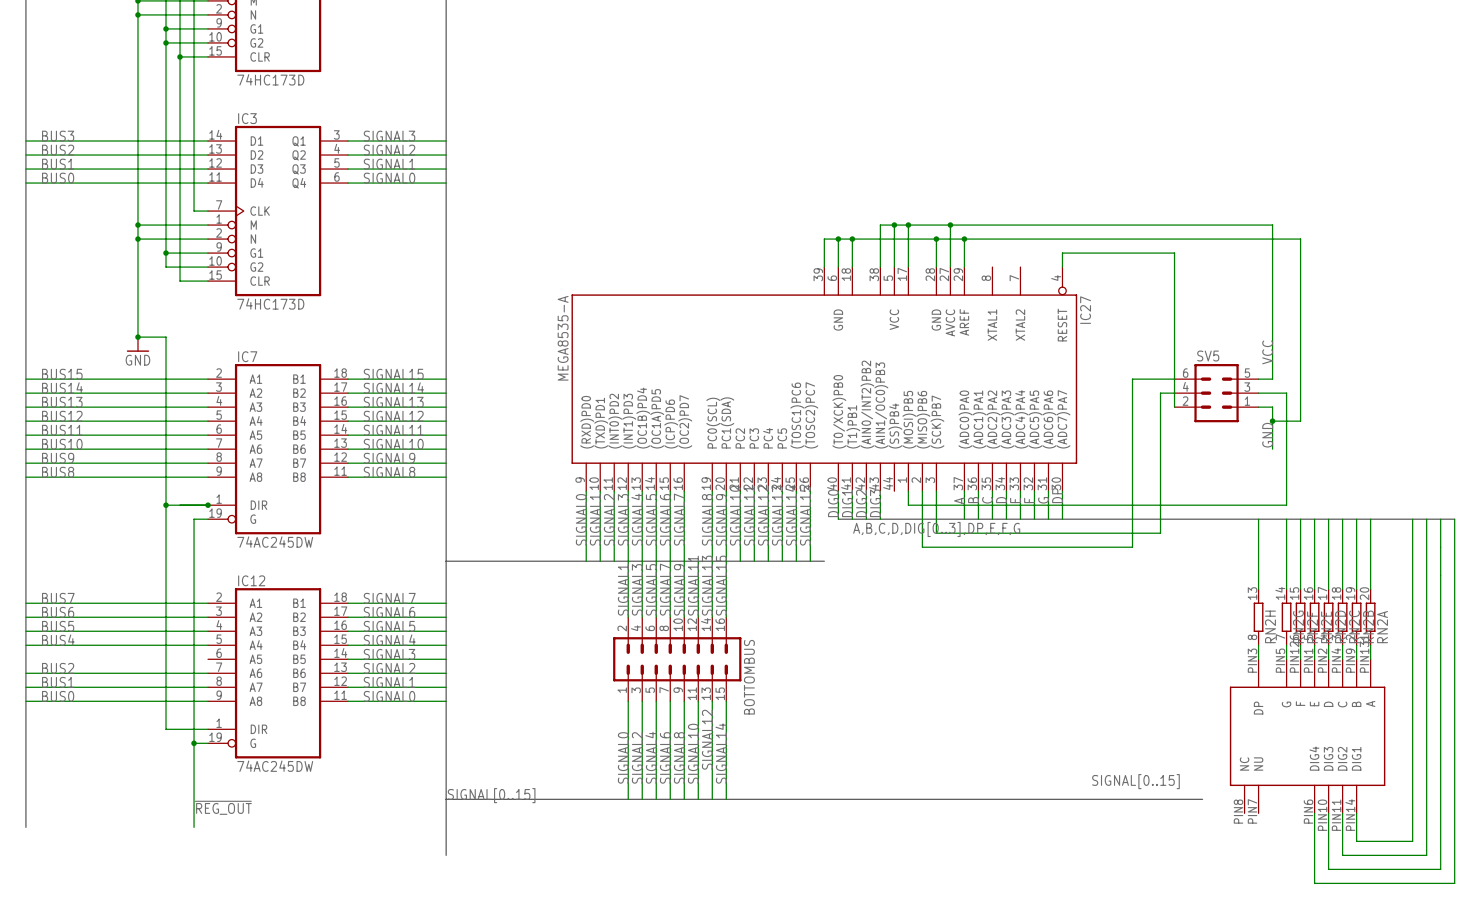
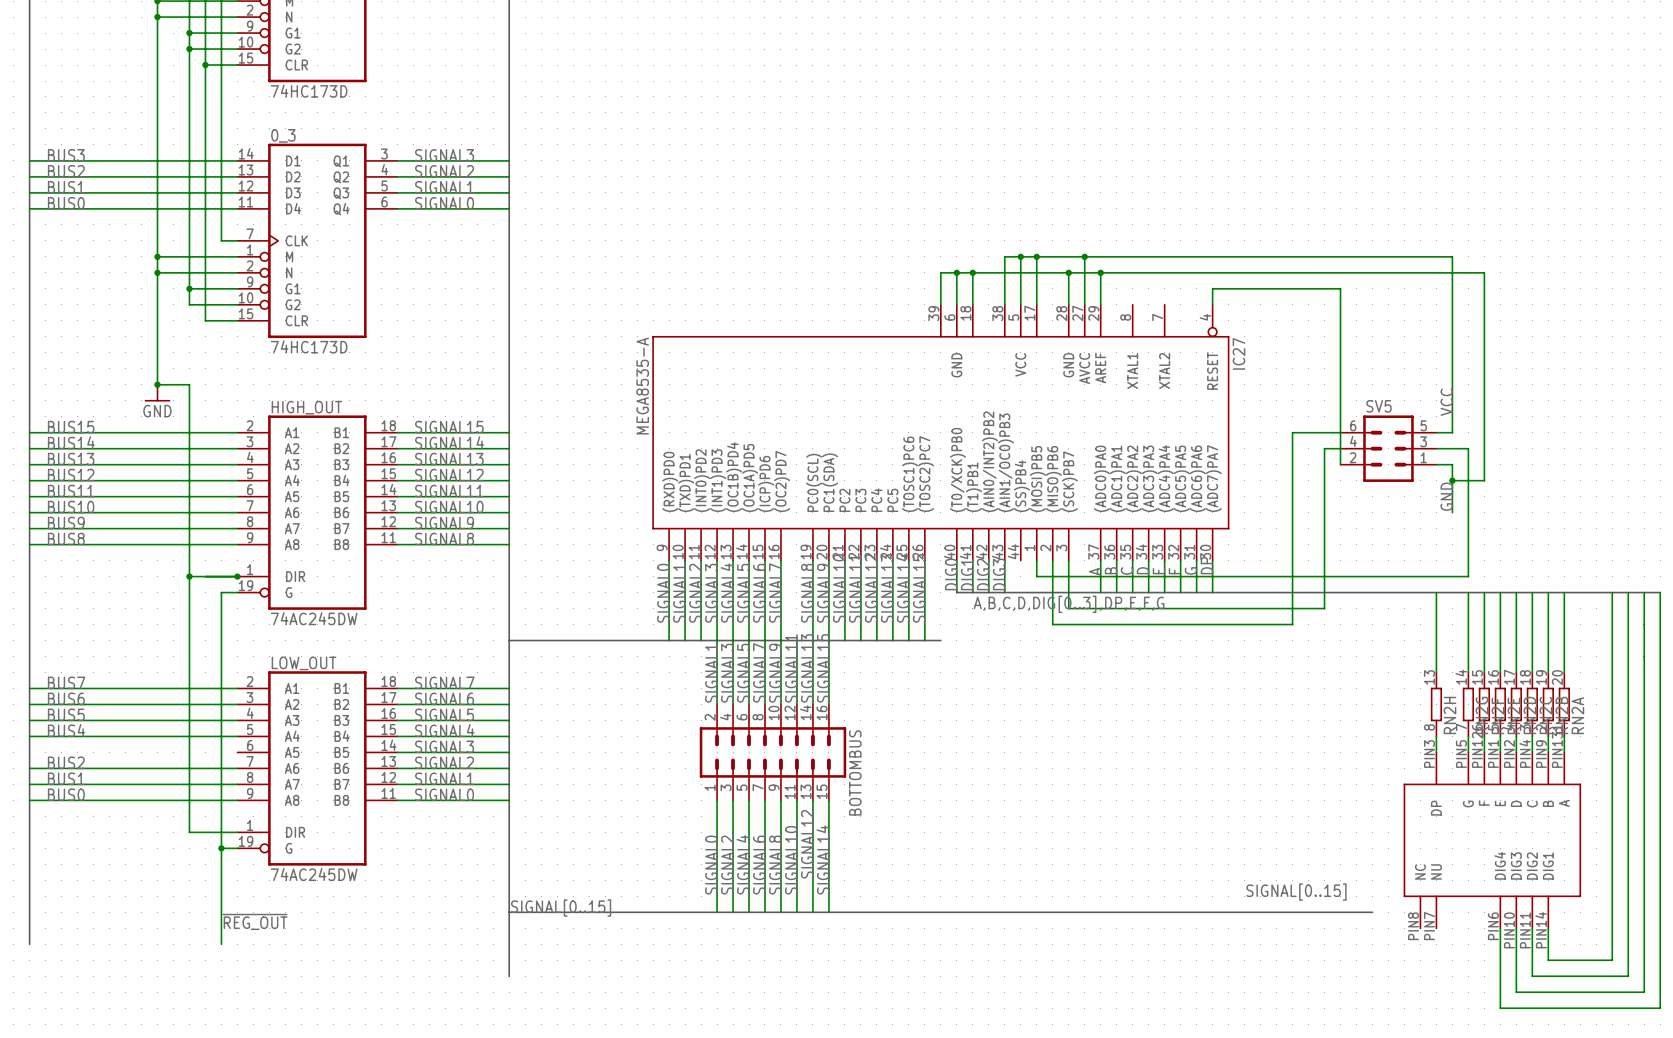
IC3 name: IC3 (247, 118) -> 0_3 (283, 135)
IC7 name: IC7 (247, 356) -> HIGH_OUT (306, 407)
IC12 name: IC12 (251, 580) -> LOW_OUT (304, 663)

